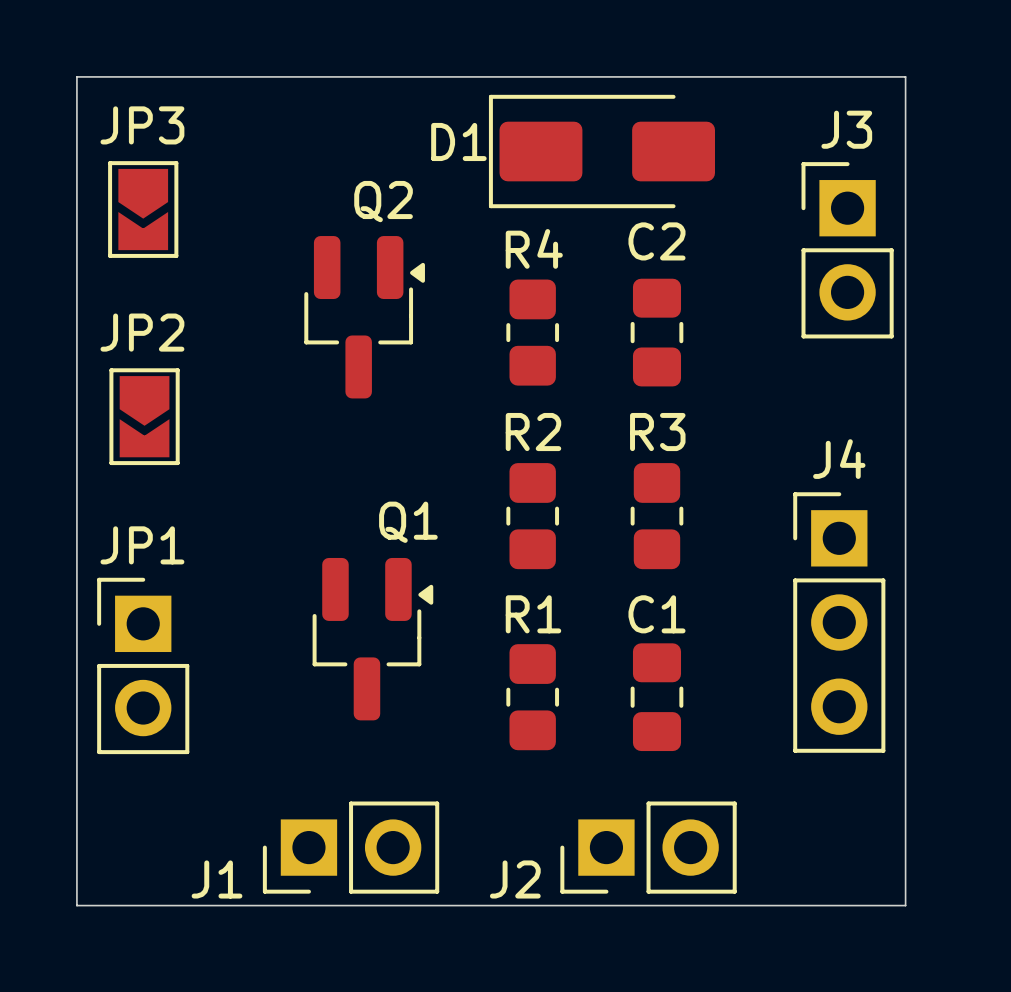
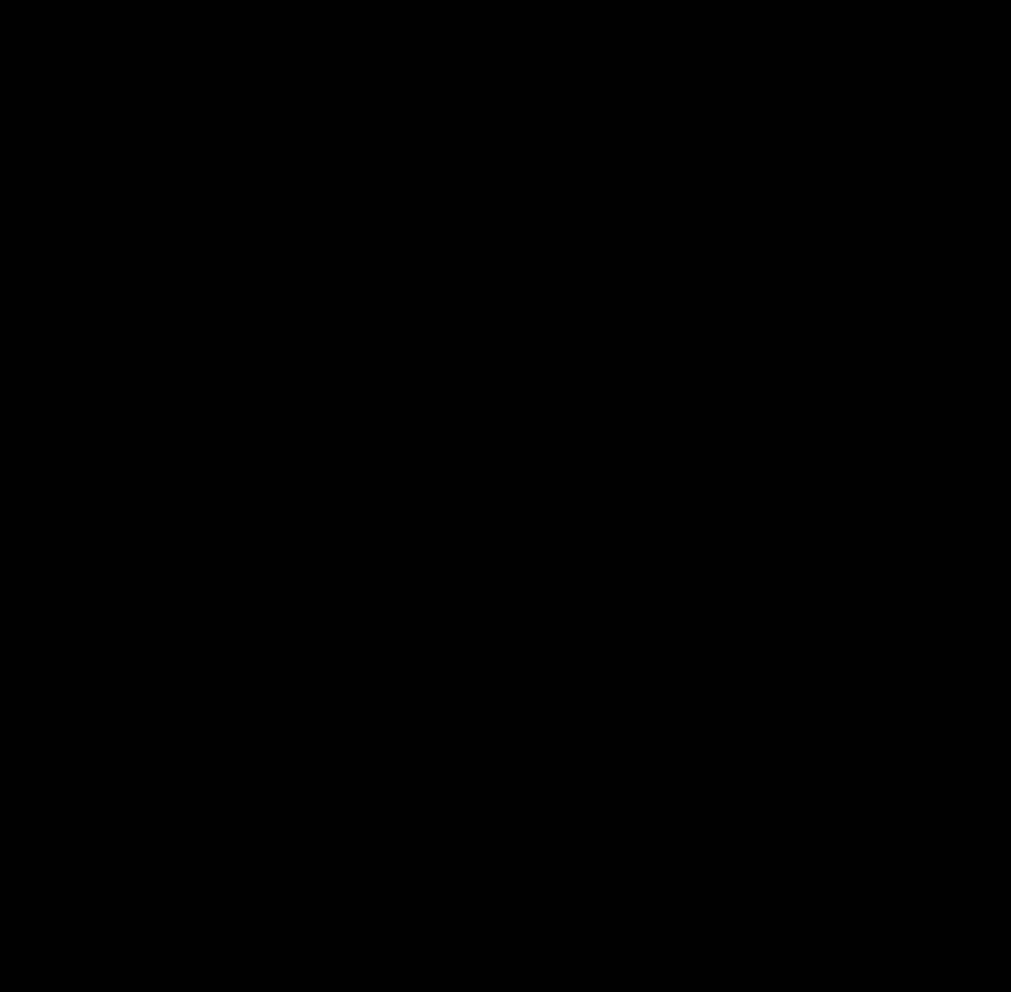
board edge: (76, 76) (905, 76) (905, 905) (76, 905) (76, 76) -> none
D1: (601, 151) -> none
JP3: (143, 209) -> none
J3: (847, 250) -> none
Q2: (364, 317) -> none
R4: (532, 332) -> none
C2: (656, 332) -> none
JP2: (144, 416) -> none
R2: (532, 516) -> none
R3: (656, 516) -> none
J4: (839, 622) -> none
Q1: (372, 639) -> none
JP1: (143, 665) -> none
R1: (532, 697) -> none
C1: (656, 697) -> none
J1: (351, 847) -> none
J2: (648, 847) -> none

